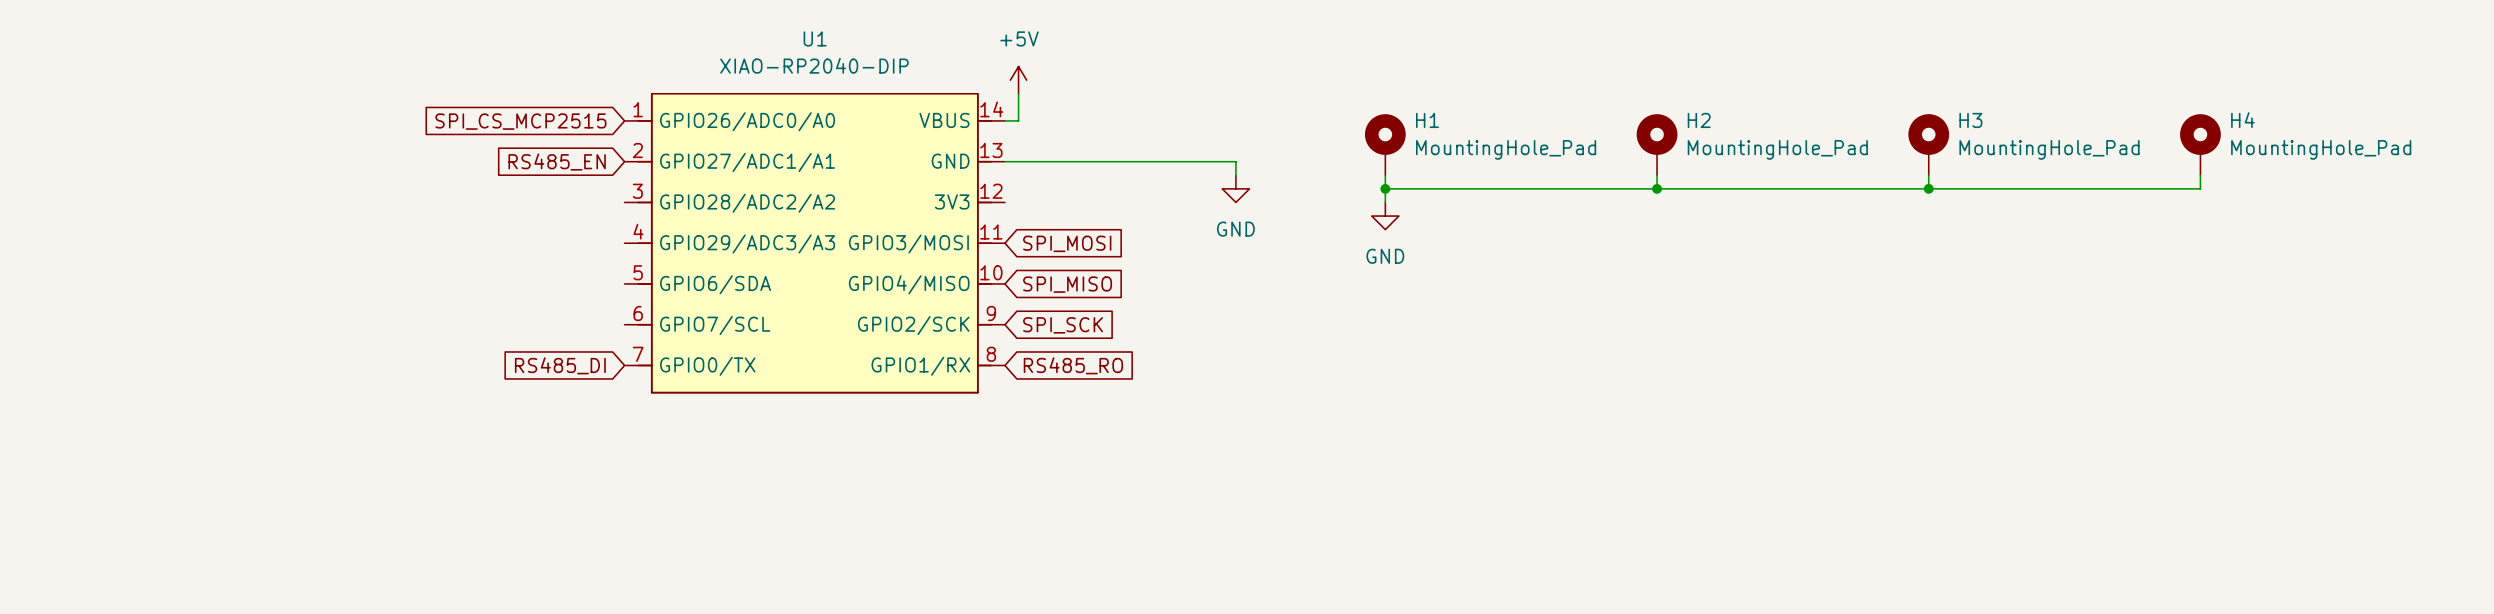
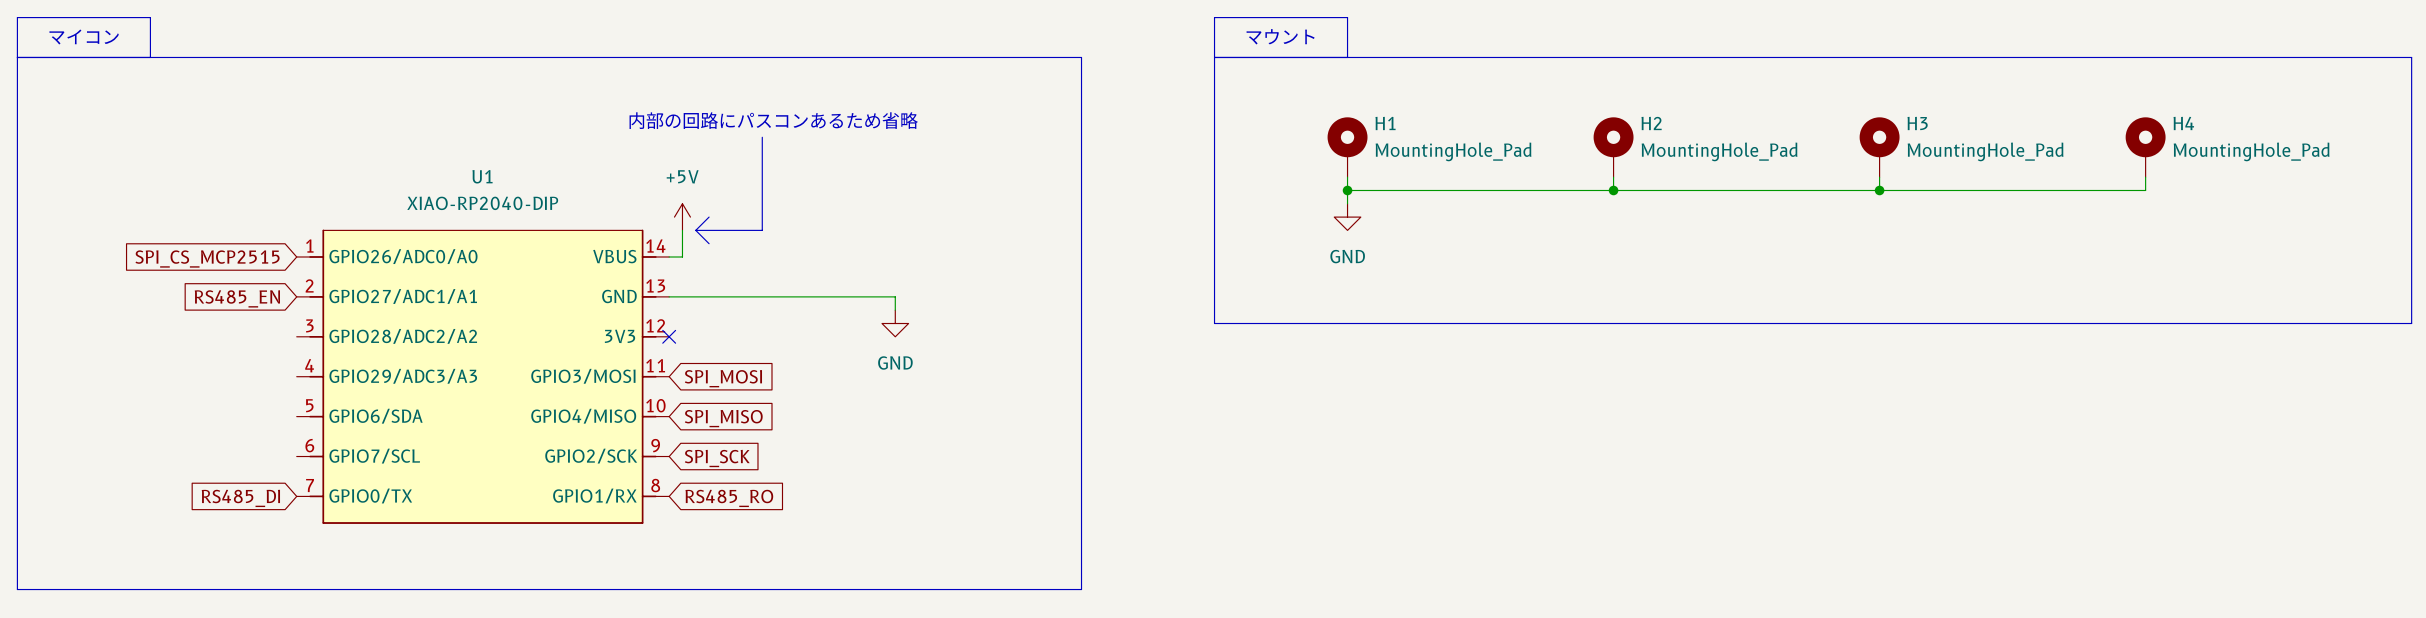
text: none -> マウント (1280, 36)
text: none -> マイコン (84, 36)
line: none -> (17, 57) (1081, 57) (1081, 589) (17, 589) (17, 17) (150, 17) (150, 57)
line: none -> (1214, 57) (2411, 57) (2411, 323) (1214, 323) (1214, 17) (1347, 17) (1347, 57)
power symbol: +5V (1018, 80) -> none
wire: (1018, 93) (1018, 120) (1004, 120) -> none
text: none -> 内部の回路にパスコンあるため省略 (773, 120)
global label: SPI_CS_MCP2515 (520, 121) -> none
line: none -> (762, 137) (762, 230) (695, 230)
wire: (1004, 161) (1235, 161) (1235, 175) -> none
global label: RS485_EN (557, 162) -> none
power symbol: GND (1235, 188) -> none
power symbol: none -> +5V (682, 217)
line: none -> (709, 217) (695, 230)
line: none -> (695, 230) (709, 243)
U1 position: (814, 243) -> (482, 376)
global label: SPI_MOSI (1067, 243) -> none
global label: none -> SPI_CS_MCP2515 (207, 258)
global label: SPI_MISO (1067, 284) -> none
global label: none -> RS485_EN (237, 298)
power symbol: none -> GND (895, 323)
global label: SPI_SCK (1063, 325) -> none
no-connect mark: none -> (669, 336)
global label: RS485_DI (560, 365) -> none
global label: RS485_RO (1073, 365) -> none
global label: none -> SPI_MOSI (723, 378)
global label: none -> SPI_MISO (723, 418)
global label: none -> SPI_SCK (717, 458)
global label: none -> RS485_DI (240, 498)
global label: none -> RS485_RO (729, 498)

